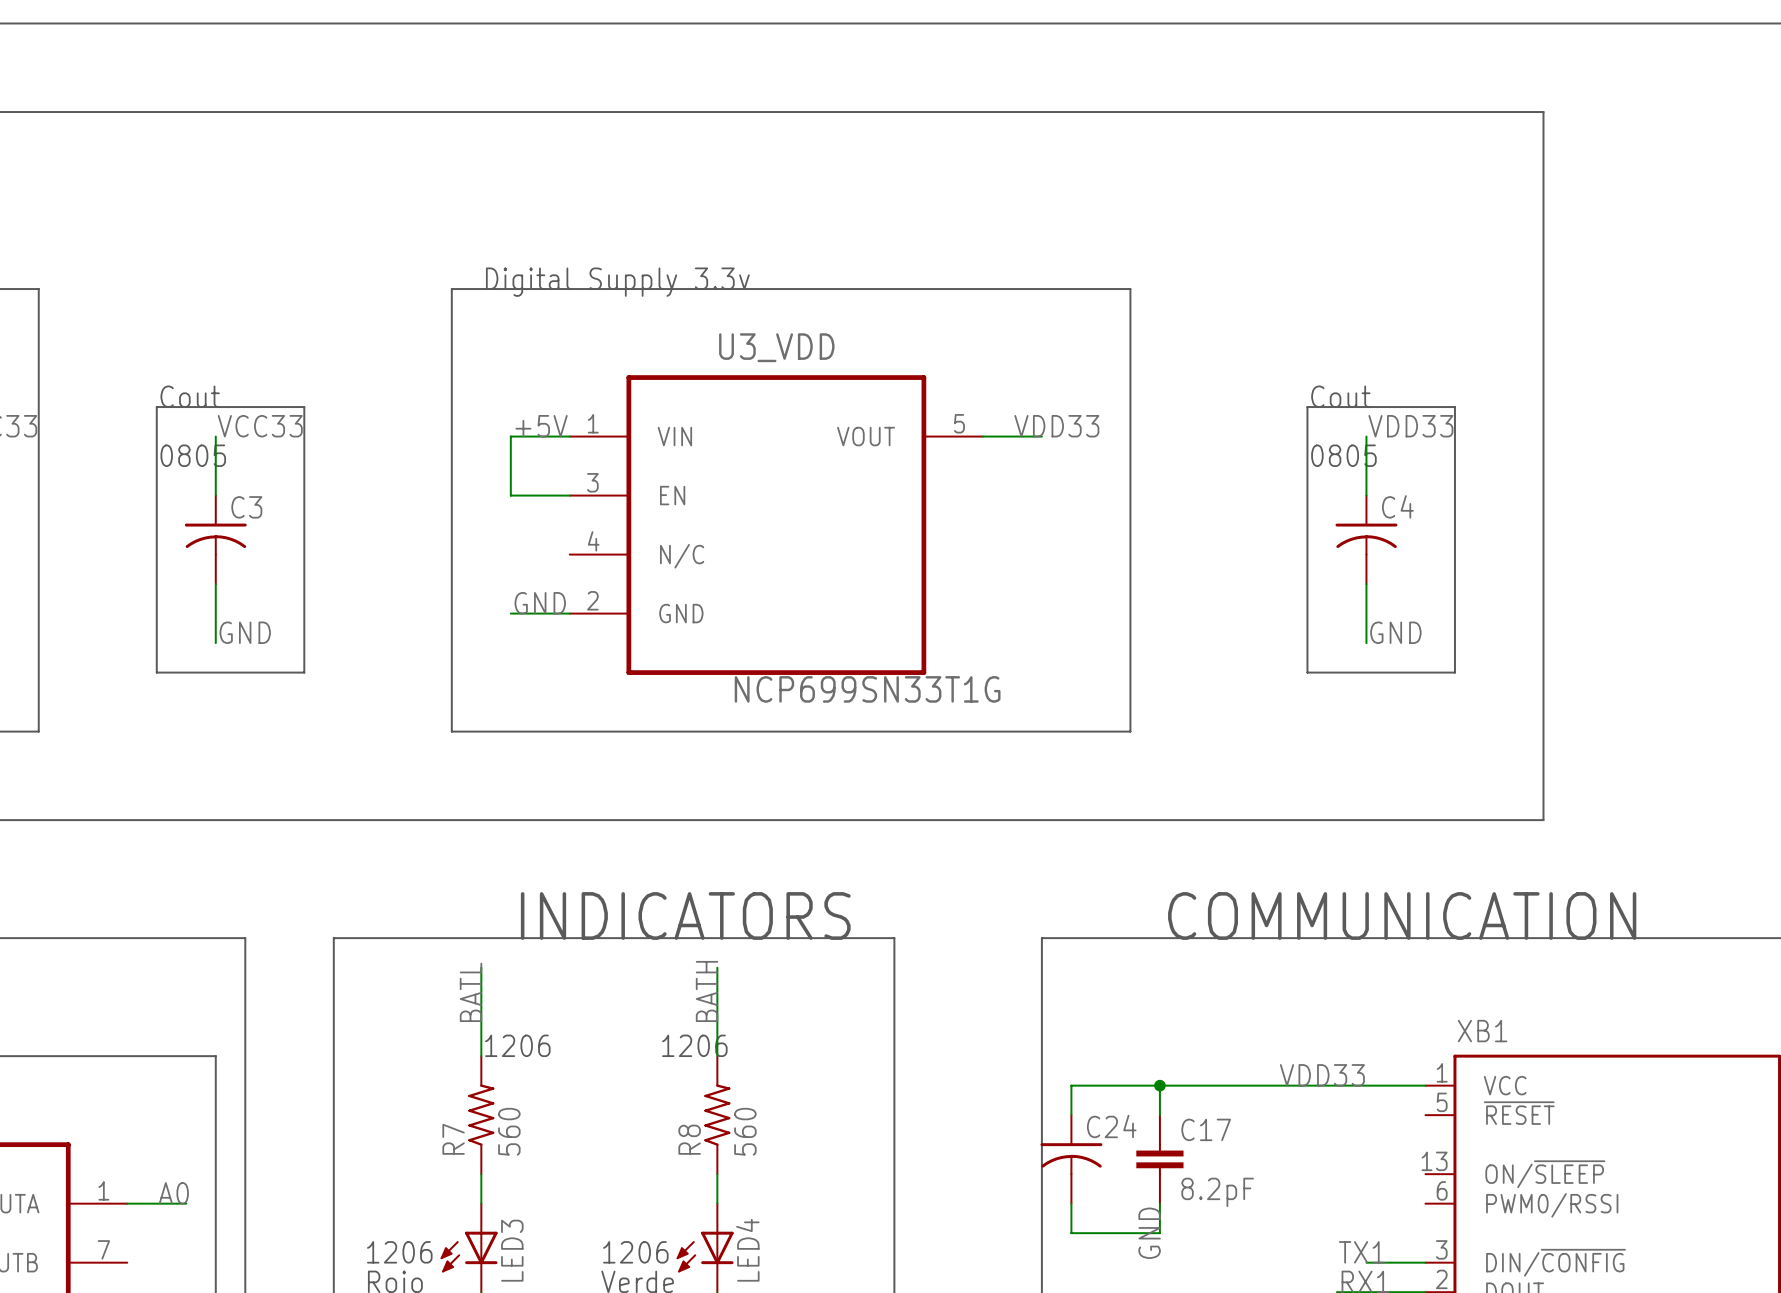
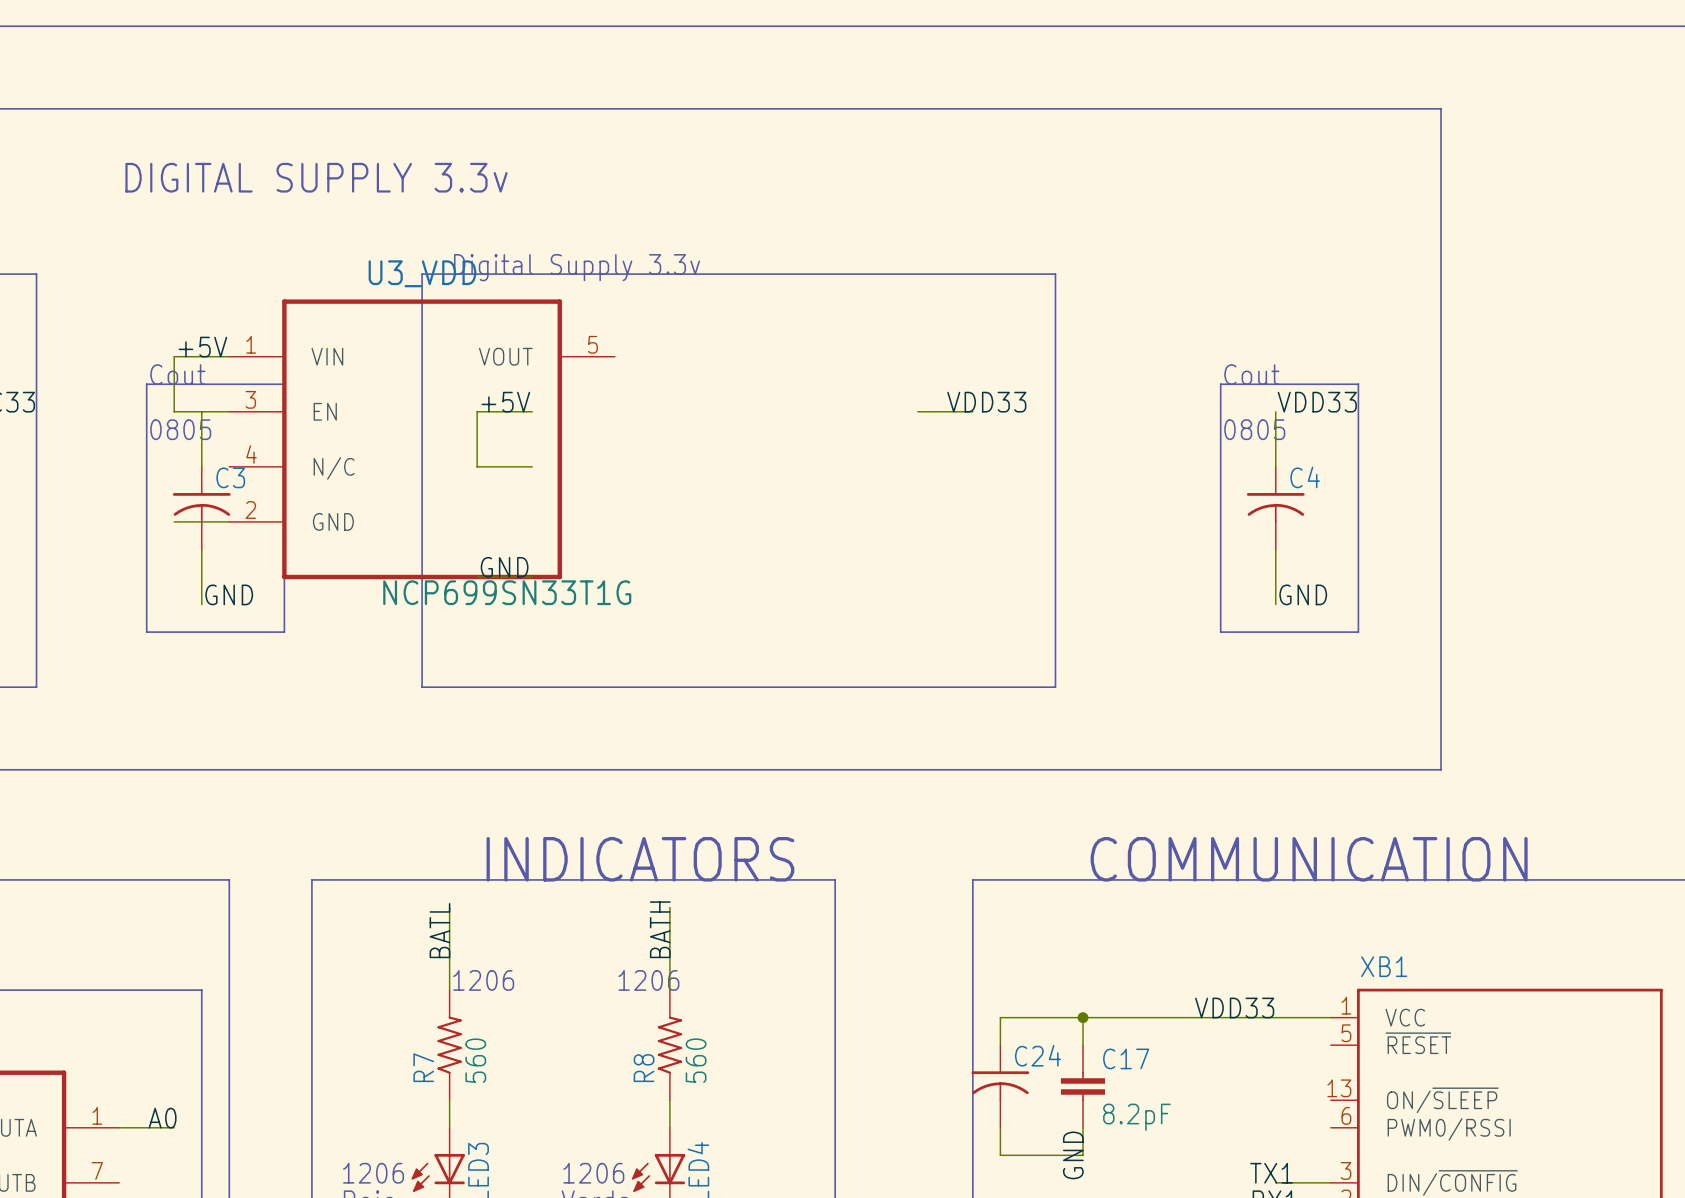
text: none -> DIGITAL SUPPLY 3.3v (316, 177)
label: none -> +5V (202, 347)
wire: none -> (229, 356) (174, 356) (174, 411) (229, 411)
label: VCC33 (260, 426) -> none
U3_VDD position: (776, 525) -> (422, 439)
wire: none -> (174, 521) (229, 521)

